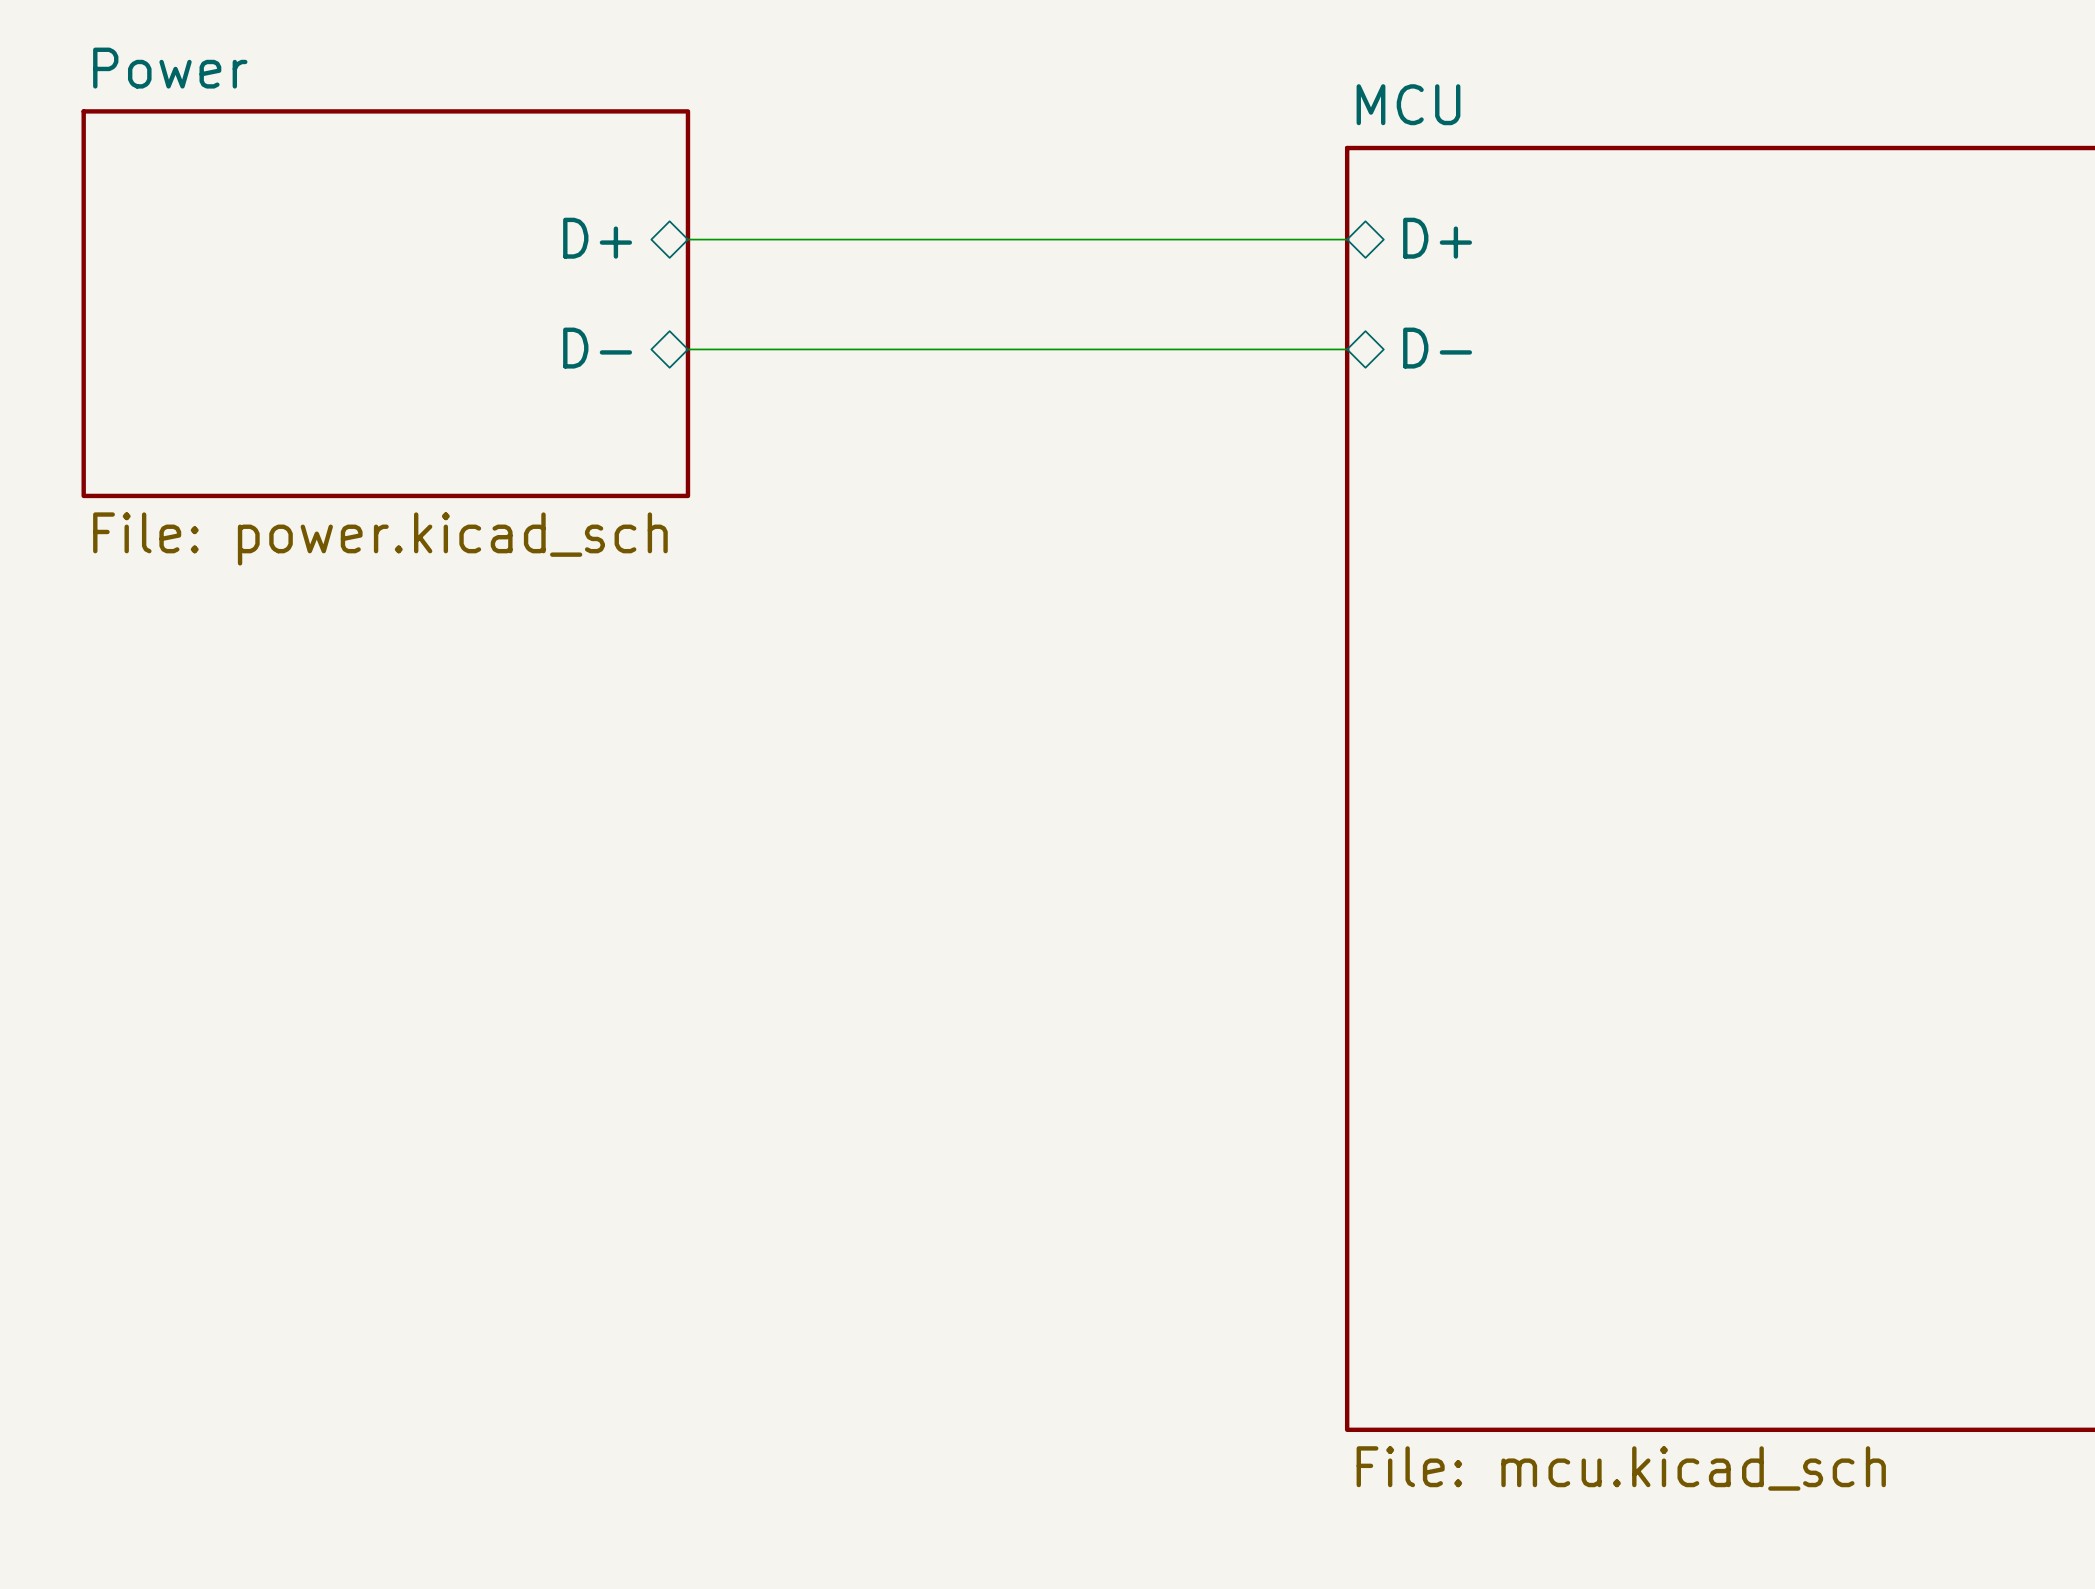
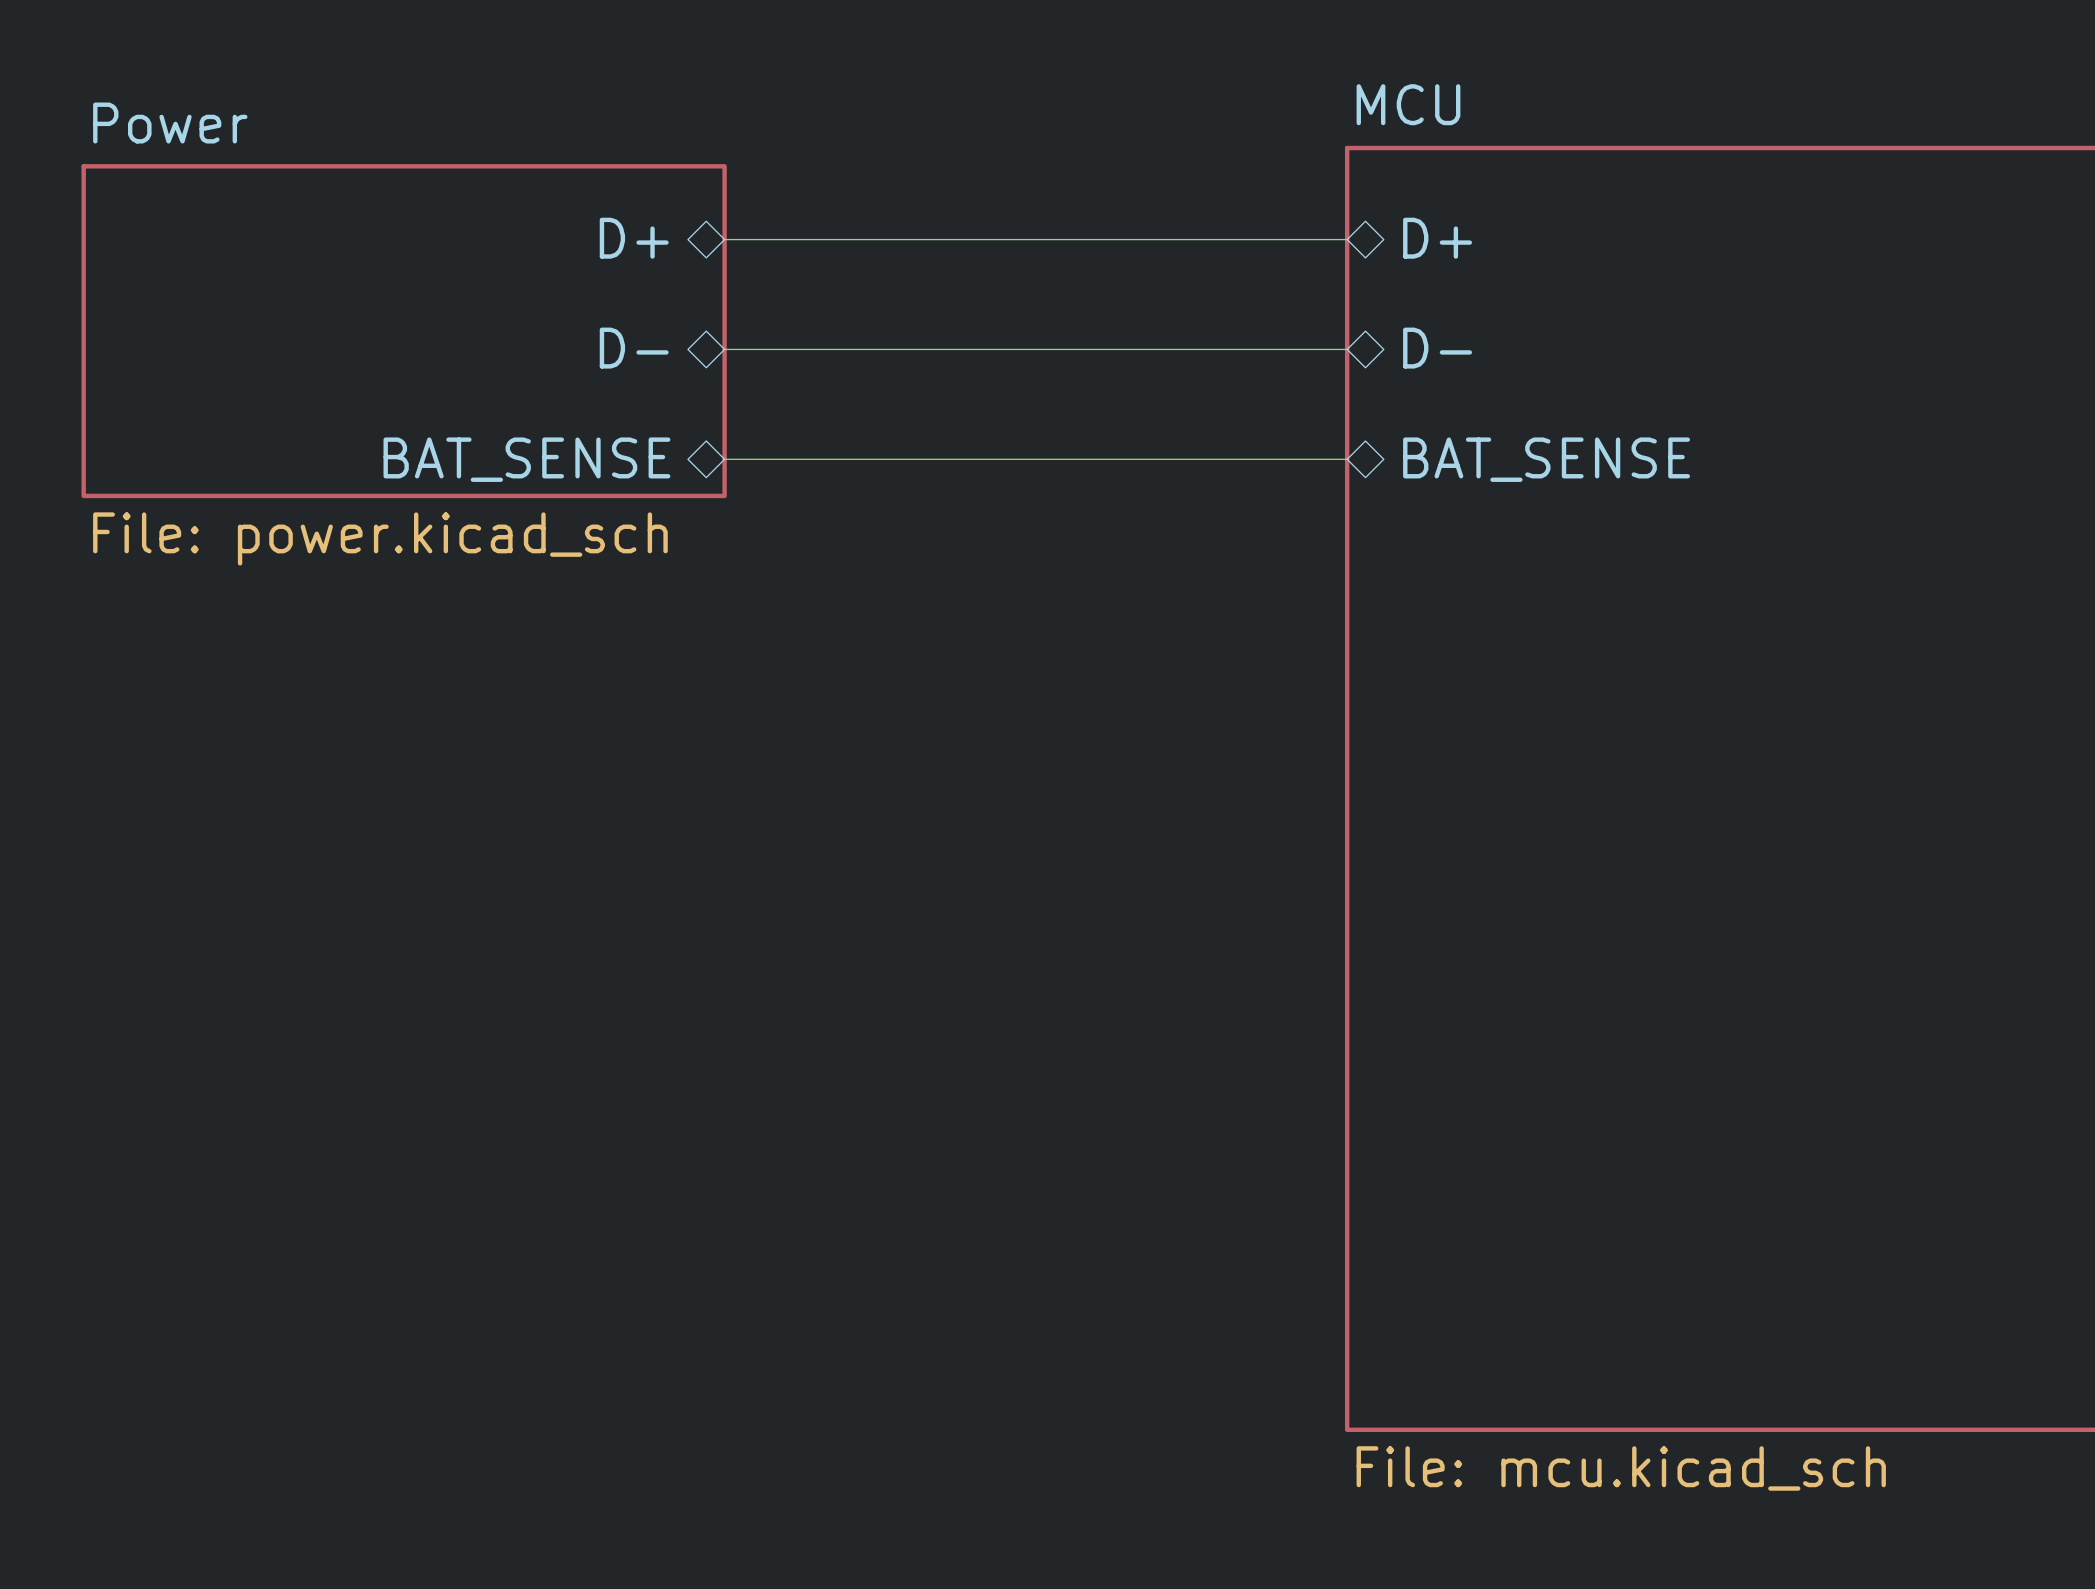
sheet pin position: D+ (597, 238) -> D+ (634, 238)
wire: (687, 239) (724, 239) -> none
sheet Power: File: power.kicad_sch (385, 303) -> none
sheet Power: none -> File: power.kicad_sch (404, 331)
sheet pin position: D- (597, 348) -> D- (634, 348)
wire: (687, 349) (724, 349) -> none
sheet pin: none -> BAT_SENSE (526, 459)
wire: none -> (724, 459) (1347, 459)
sheet pin: none -> BAT_SENSE (1546, 459)

